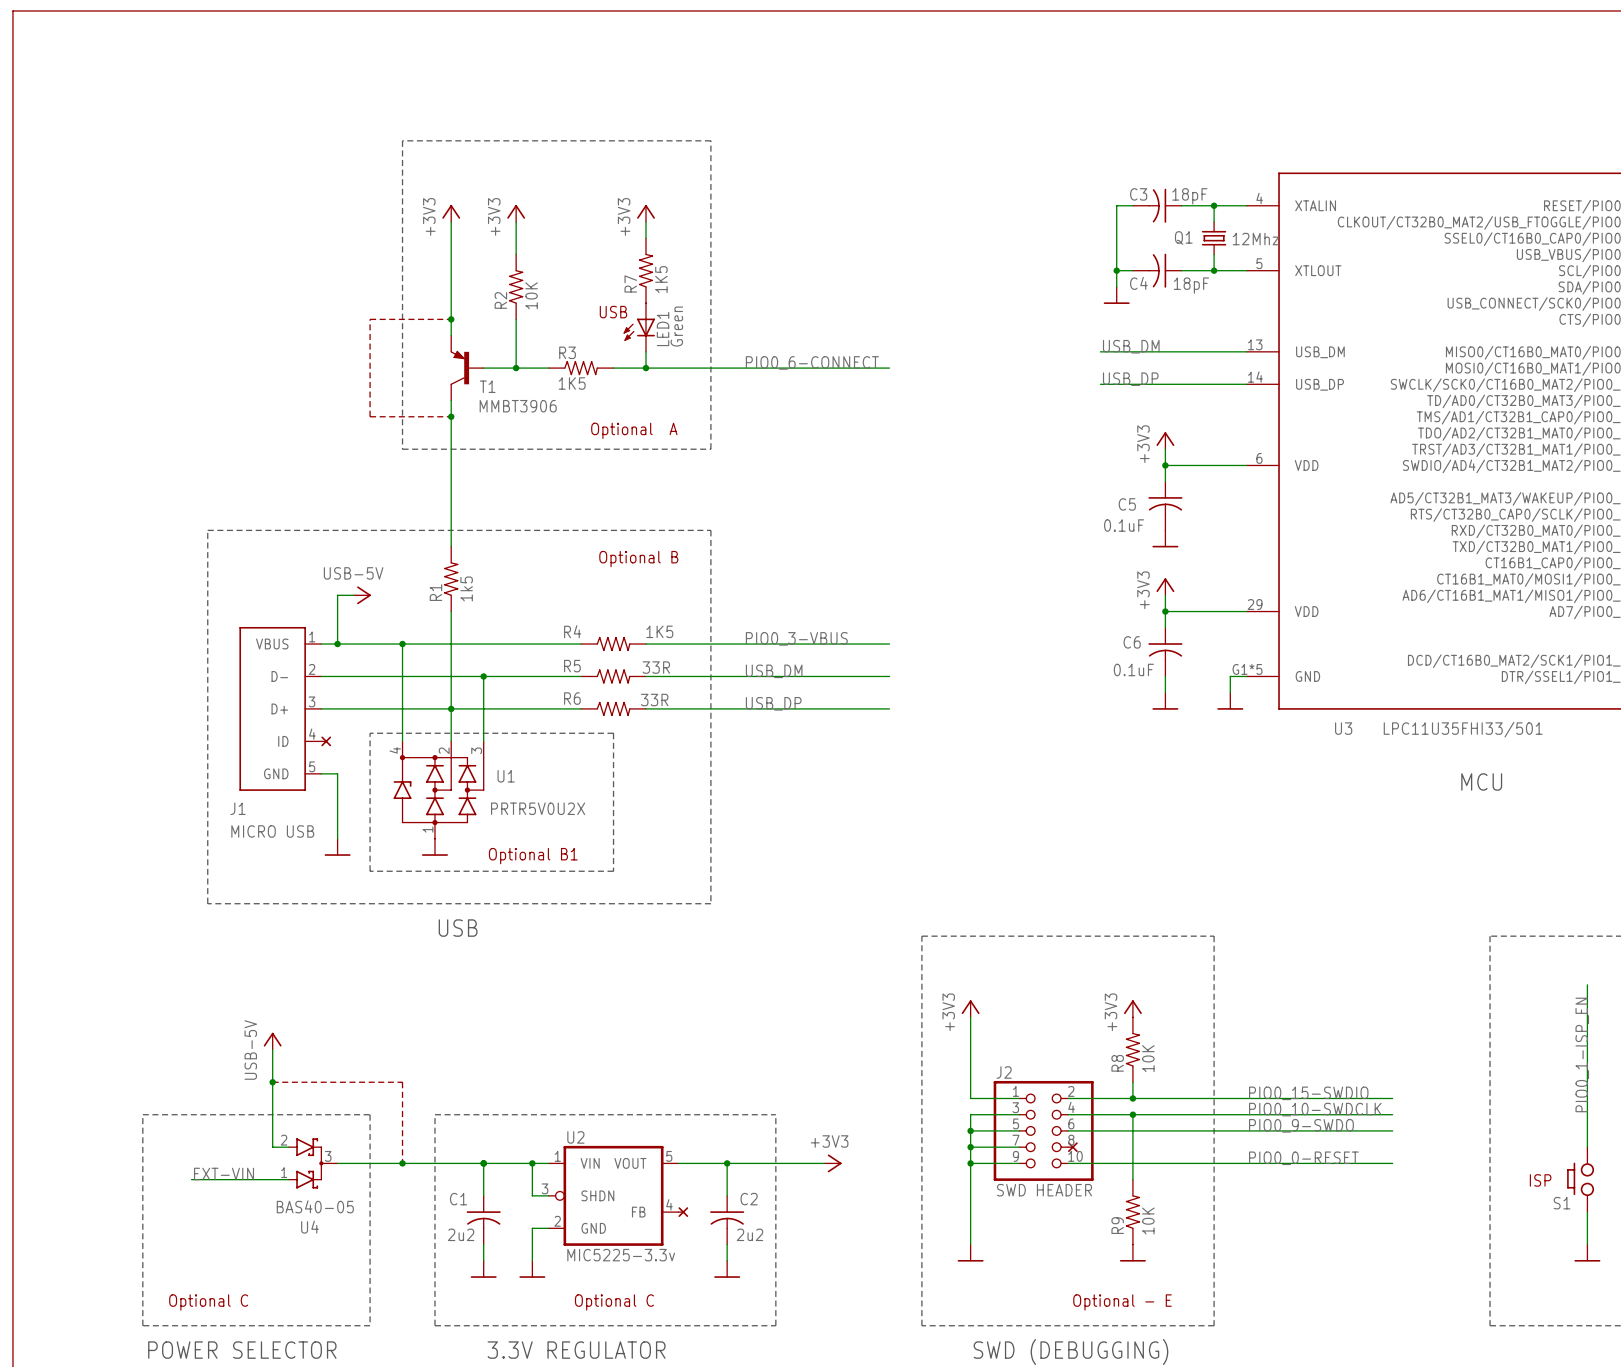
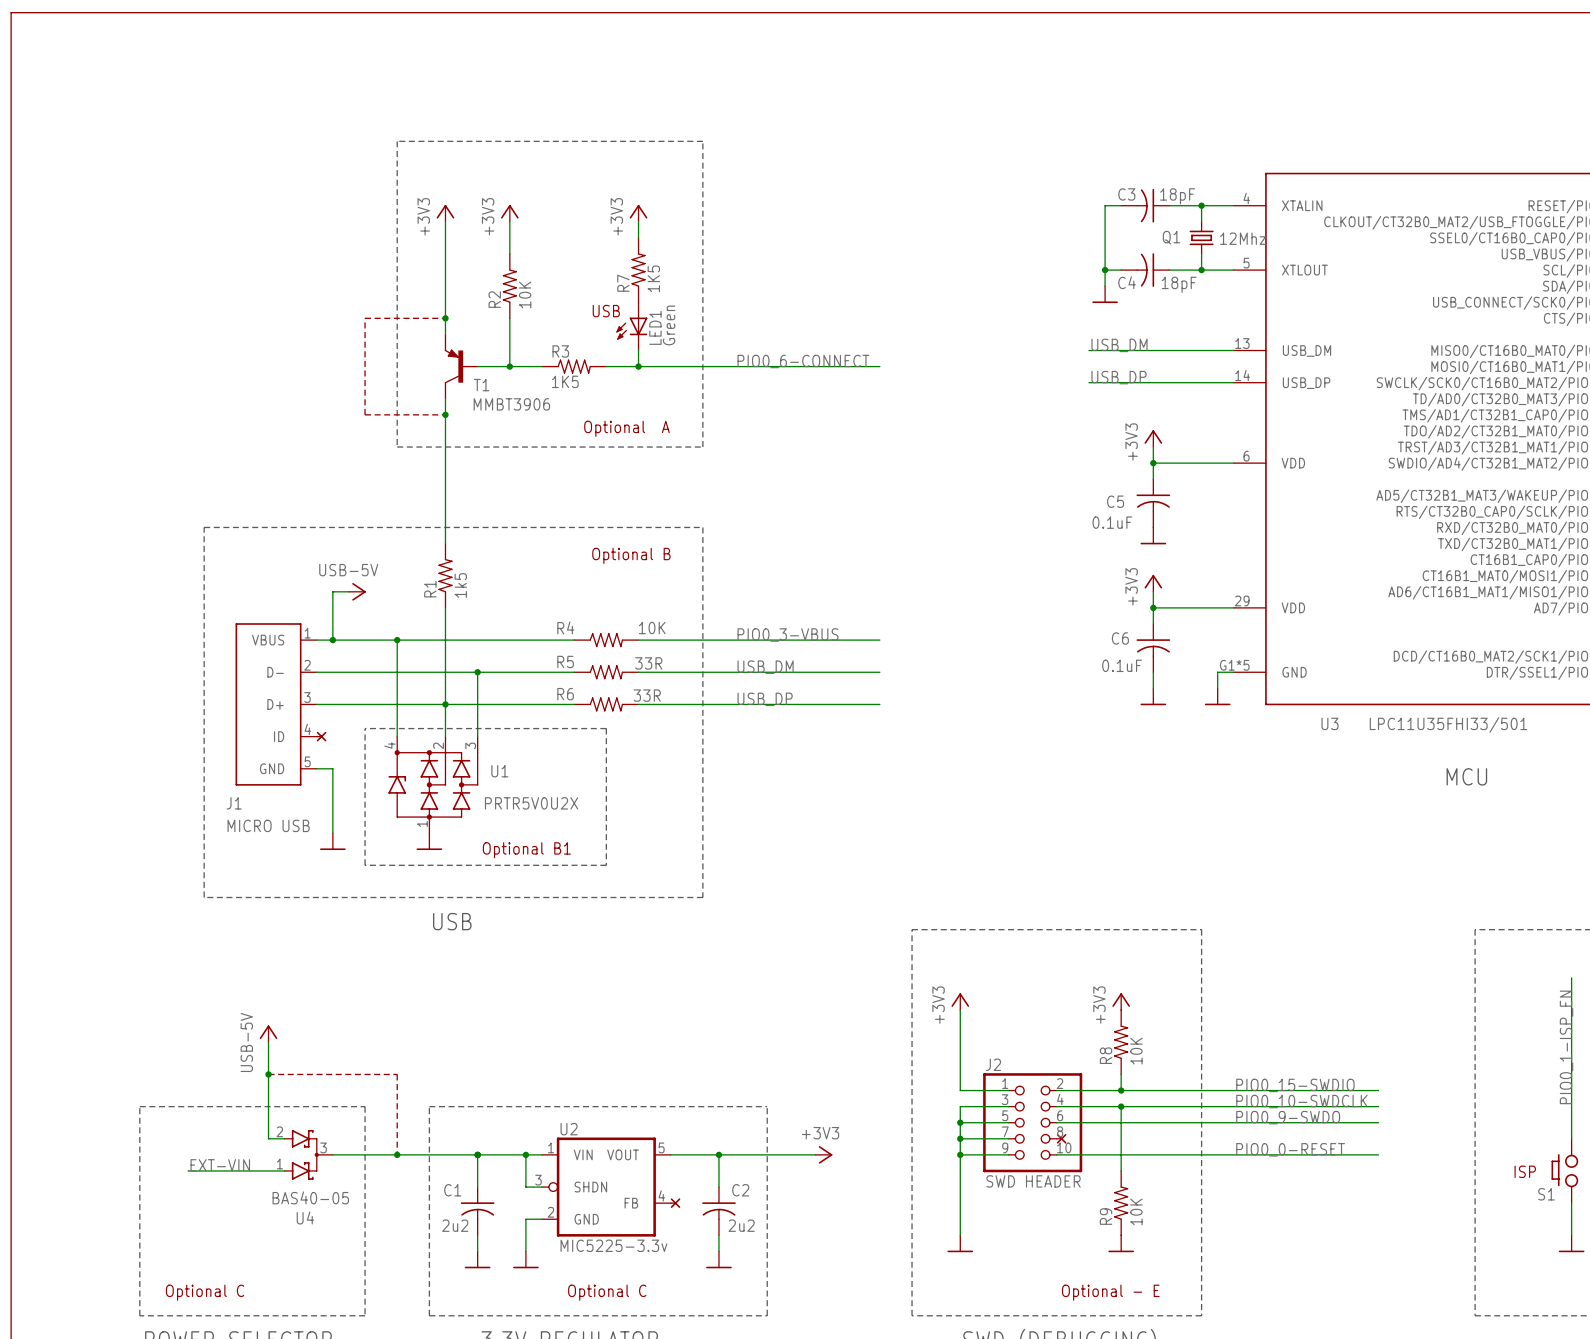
R4 value: 1K5 (659, 631) -> 10K (652, 628)

